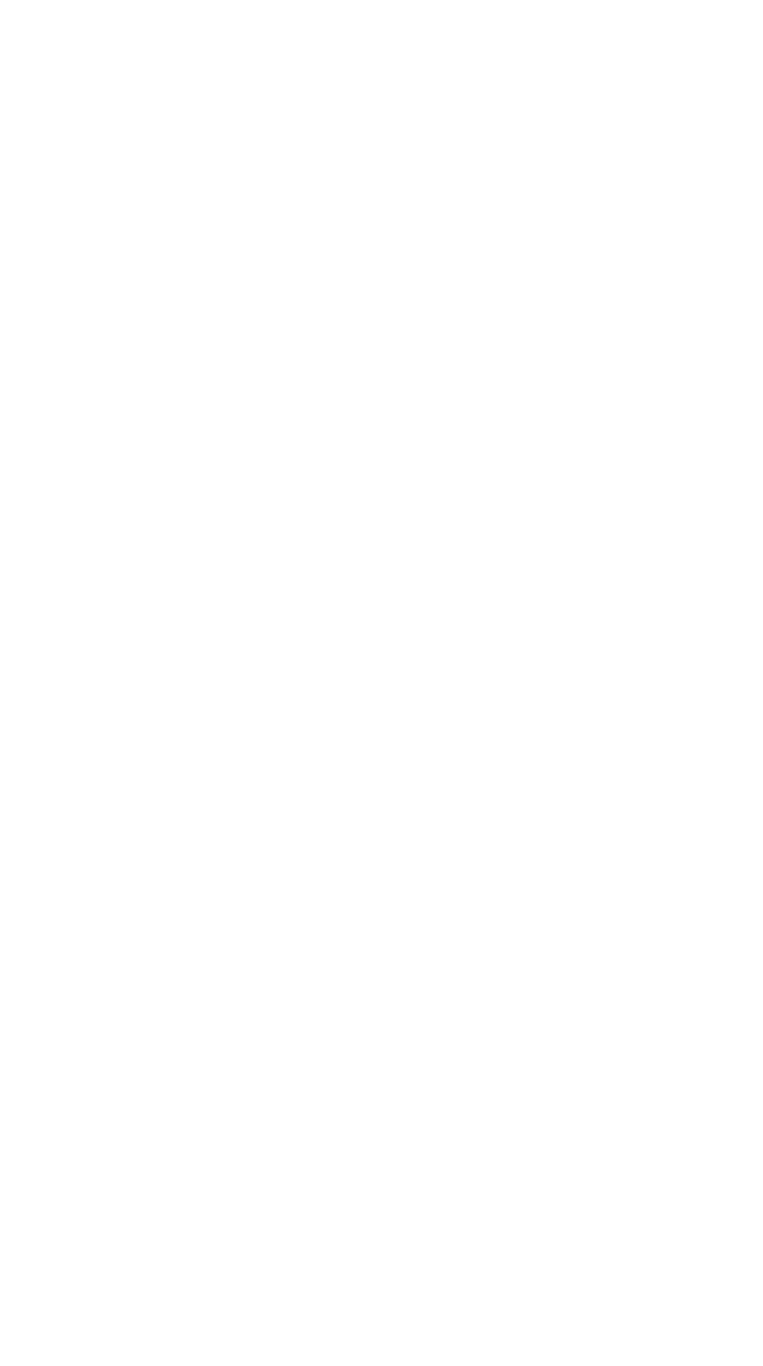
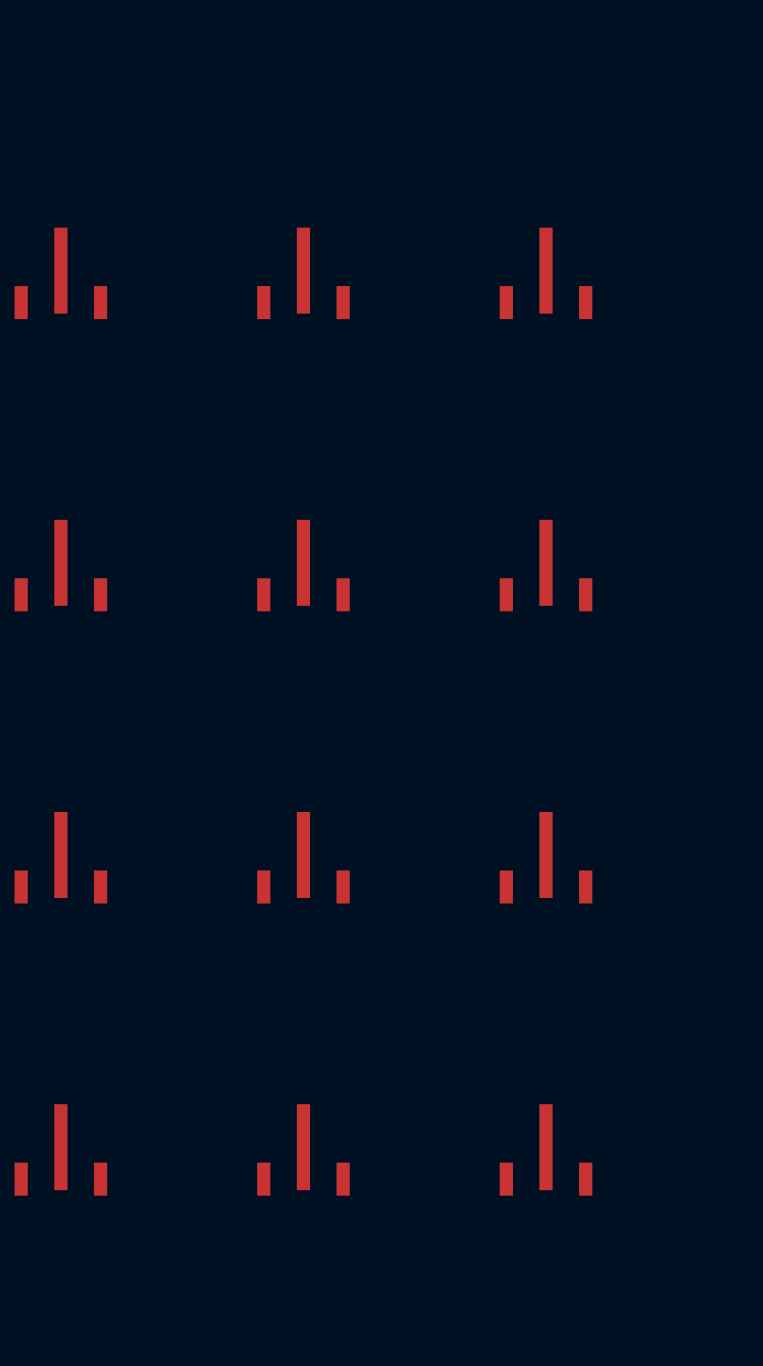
part: none -> (60, 244)
part: none -> (303, 244)
part: none -> (546, 244)
part: none -> (60, 536)
part: none -> (303, 536)
part: none -> (546, 536)
part: none -> (60, 829)
part: none -> (303, 829)
part: none -> (546, 829)
part: none -> (60, 1121)
part: none -> (303, 1121)
part: none -> (546, 1121)

